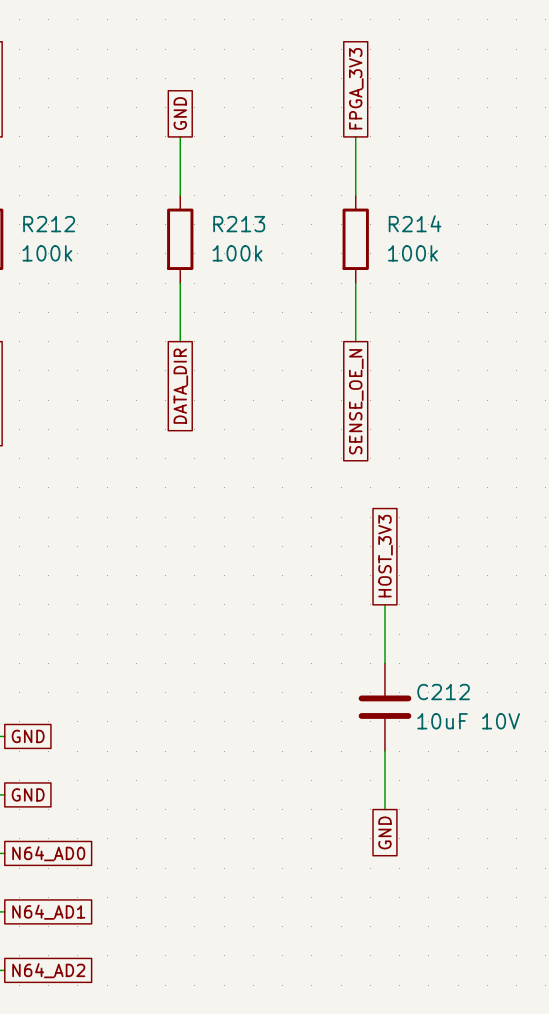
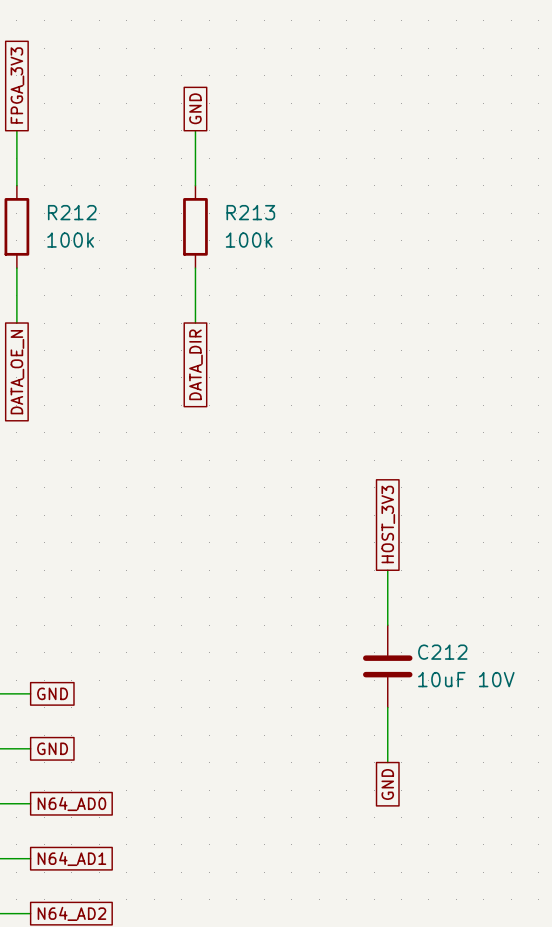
global label: FPGA_3V3 (356, 88) -> none
wire: (355, 136) (355, 195) -> none
R214: 100k (355, 239) -> none
wire: (355, 283) (355, 341) -> none
global label: SENSE_OE_N (356, 401) -> none

